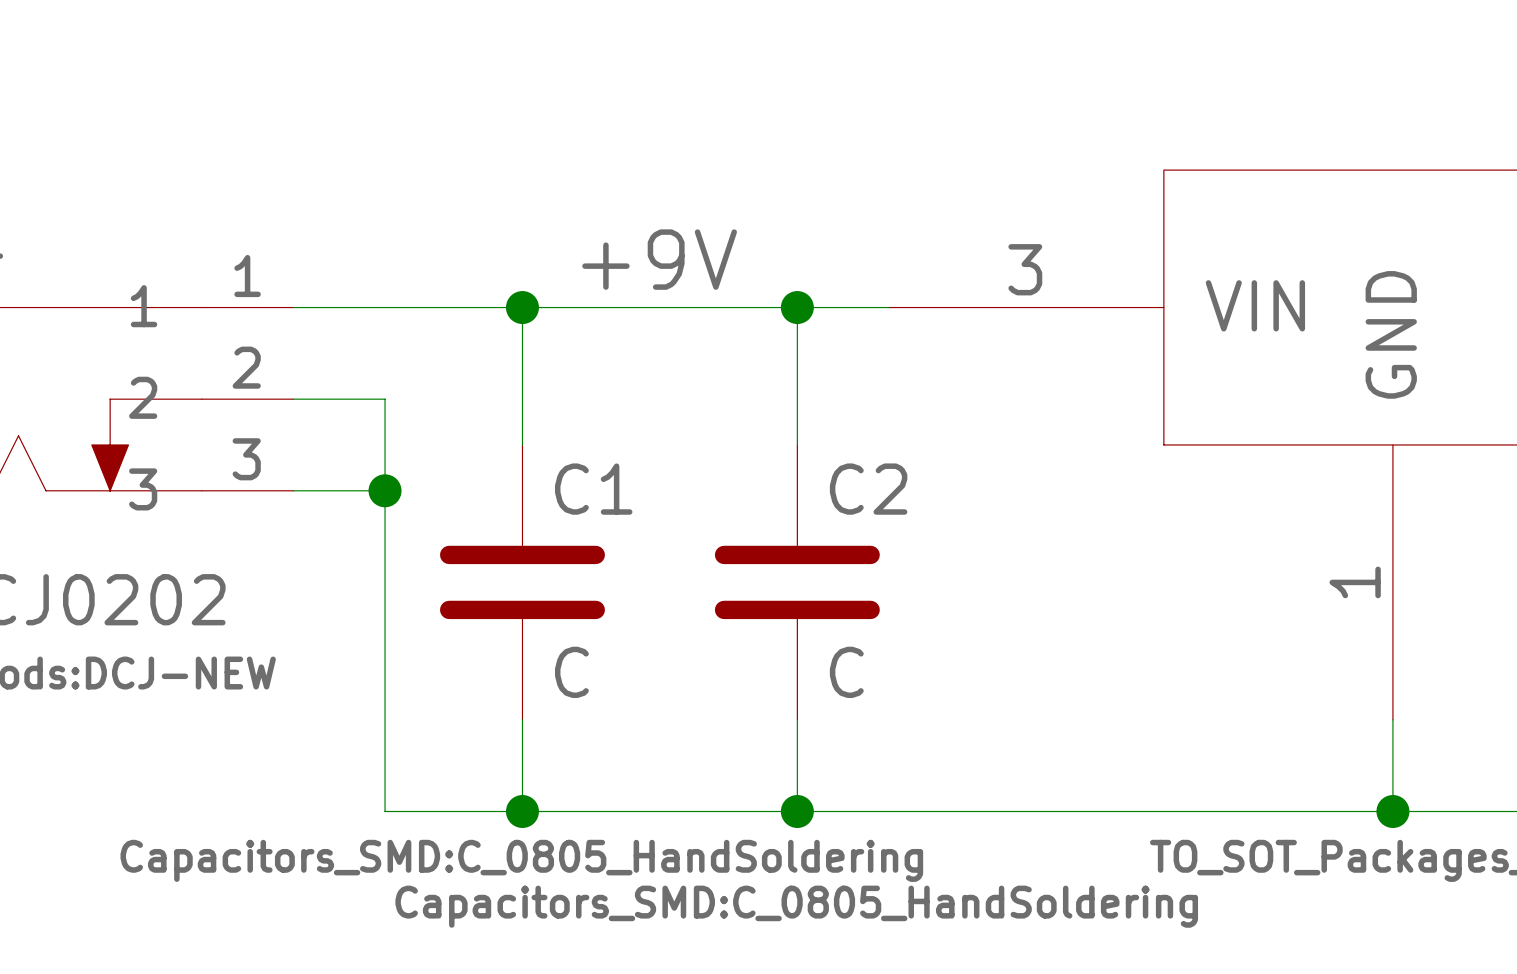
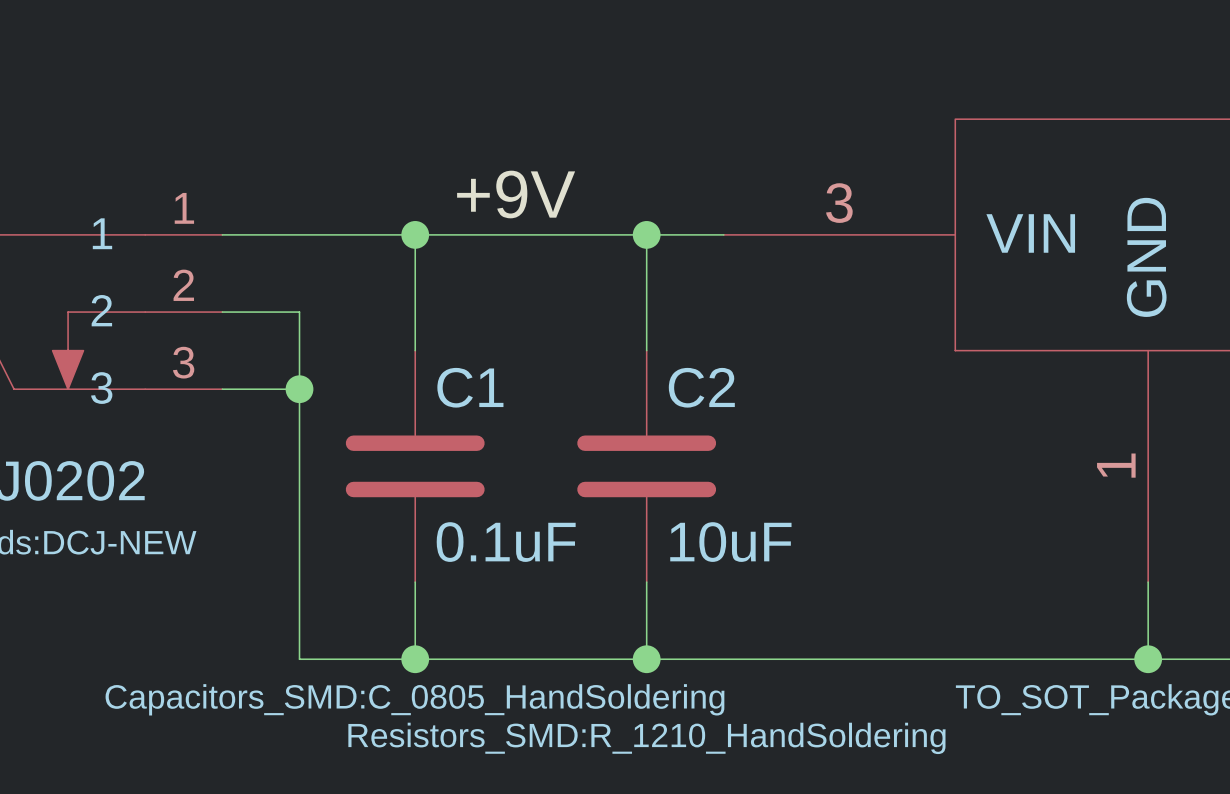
C1 value: C (571, 672) -> 0.1uF (506, 542)
C2 value: C (846, 672) -> 10uF (730, 542)
C2 text: Capacitors_SMD:C_0805_HandSoldering (796, 906) -> Resistors_SMD:R_1210_HandSoldering (646, 738)

